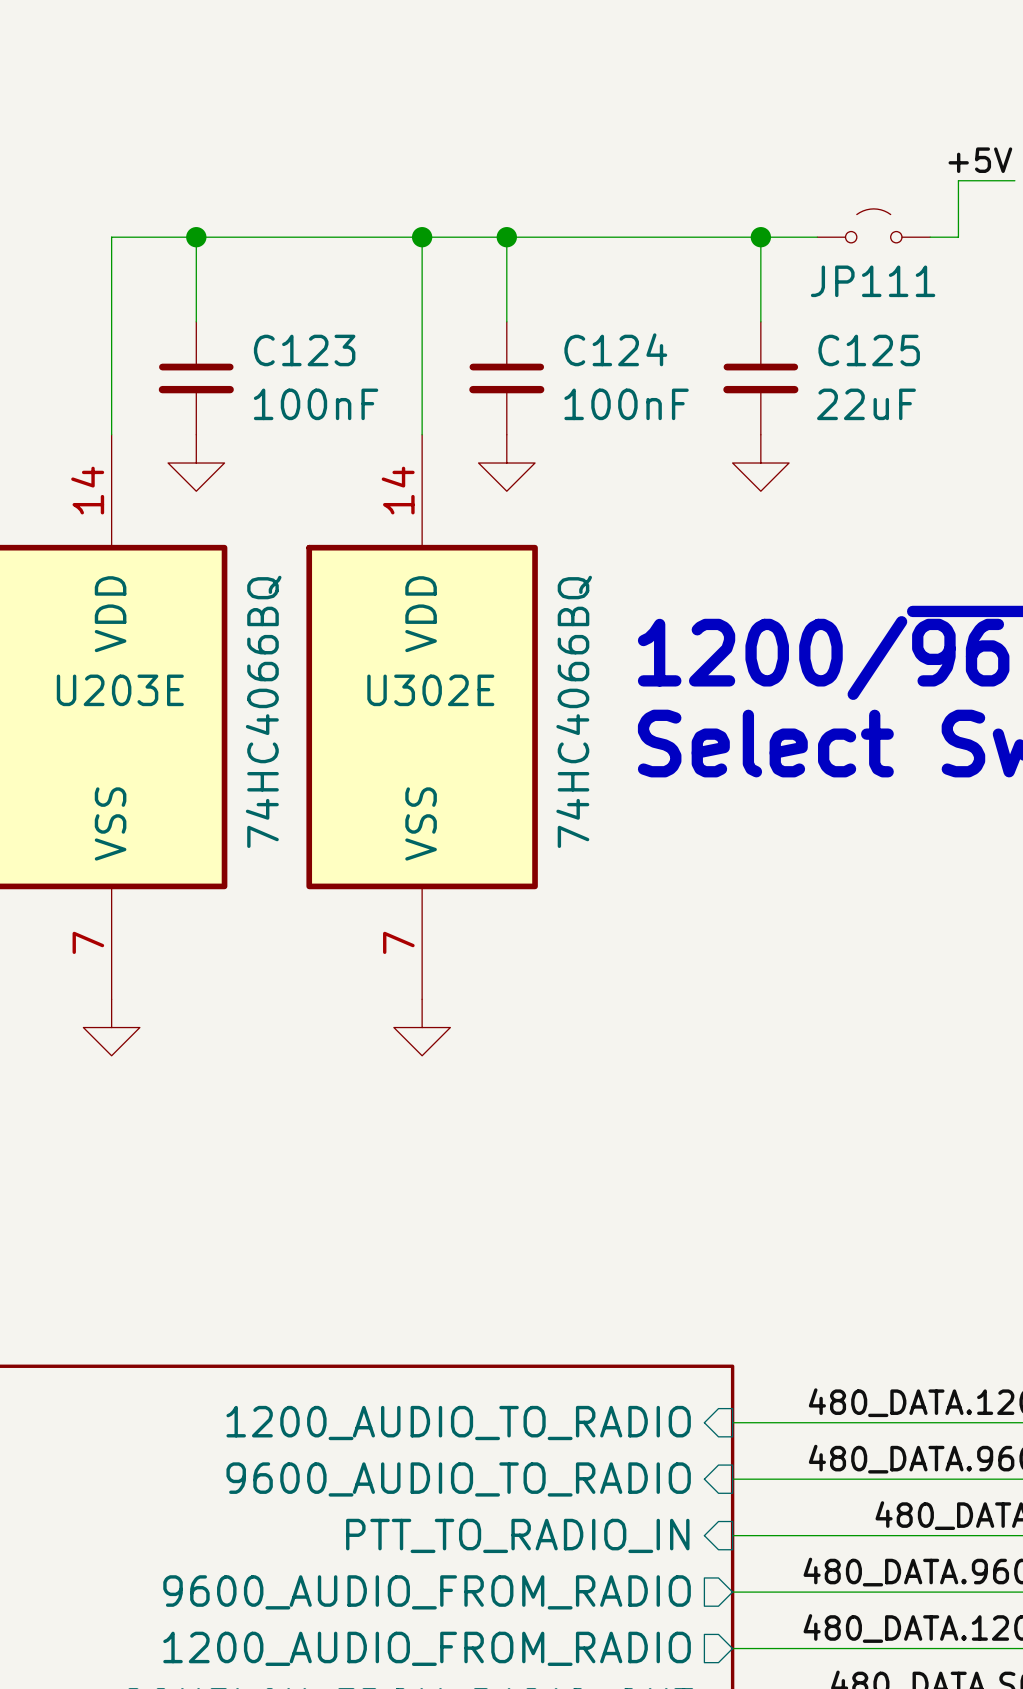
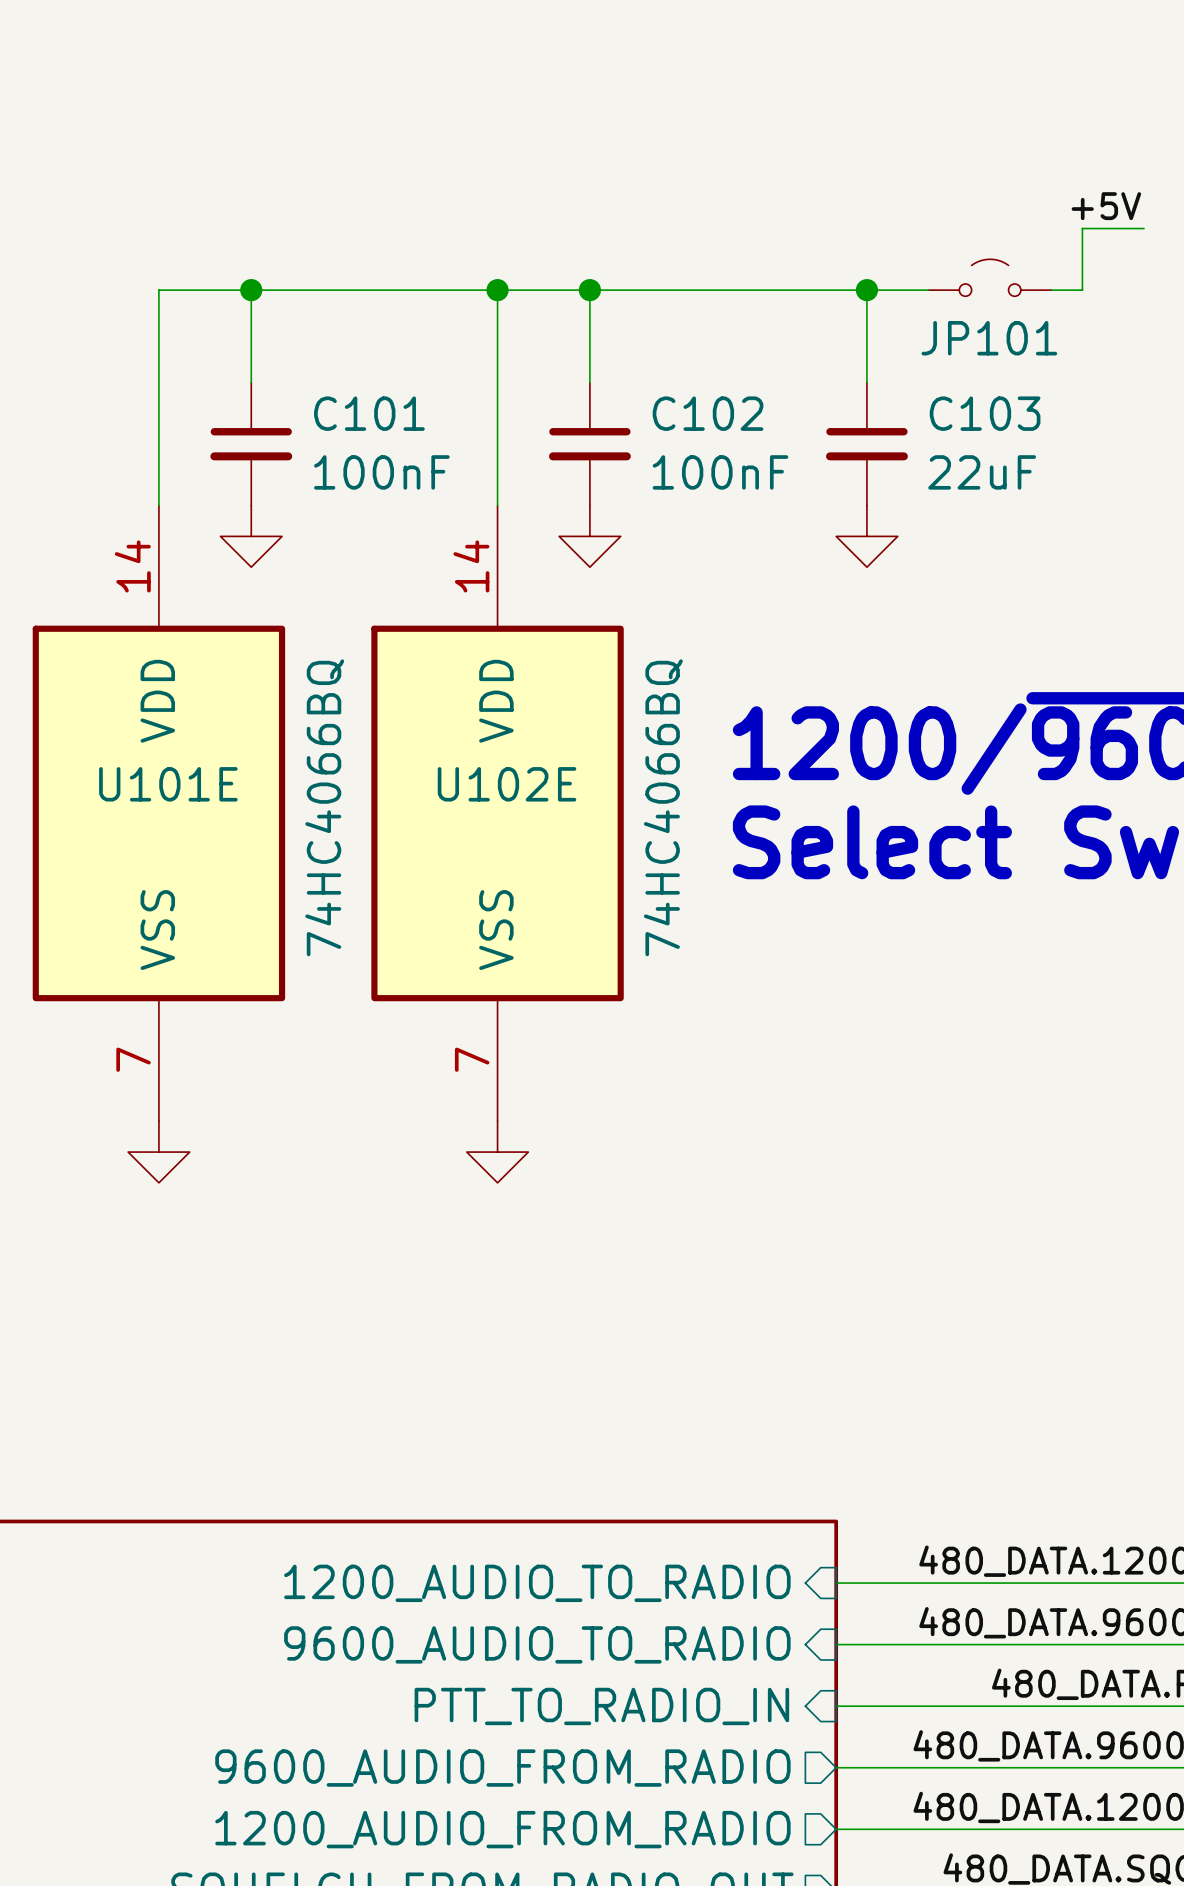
JP111 name: JP111 (873, 281) -> JP101 (989, 338)
C124 name: C124 (615, 349) -> C102 (708, 413)
C123 name: C123 (304, 350) -> C101 (369, 413)
C125 name: C125 (869, 350) -> C103 (985, 413)
U203E name: U203E (120, 690) -> U101E (168, 784)
U302E name: U302E (430, 690) -> U102E (507, 784)

